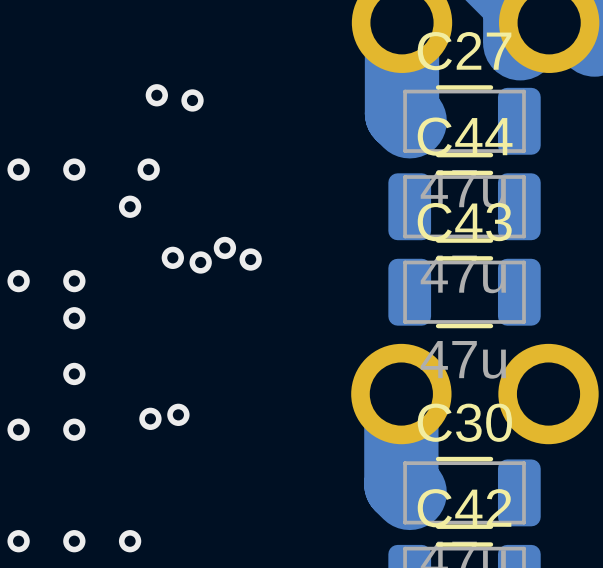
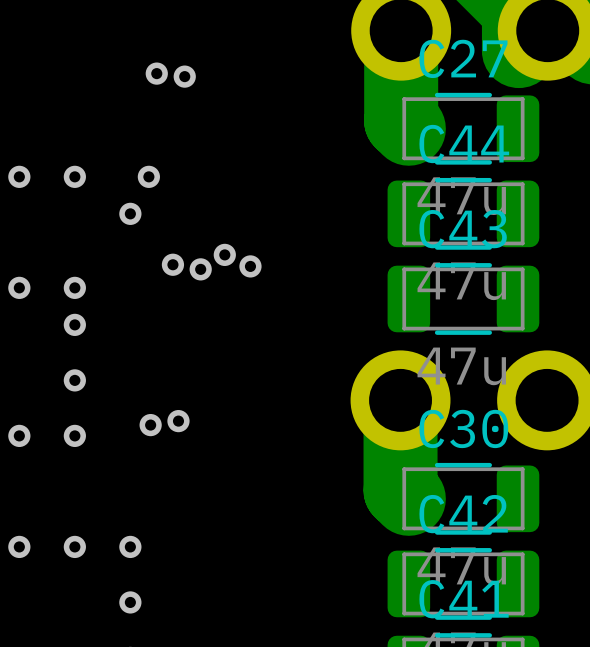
via: none -> (156, 73)
via: none -> (184, 76)
via: (156, 95) -> none
via: (192, 100) -> none

